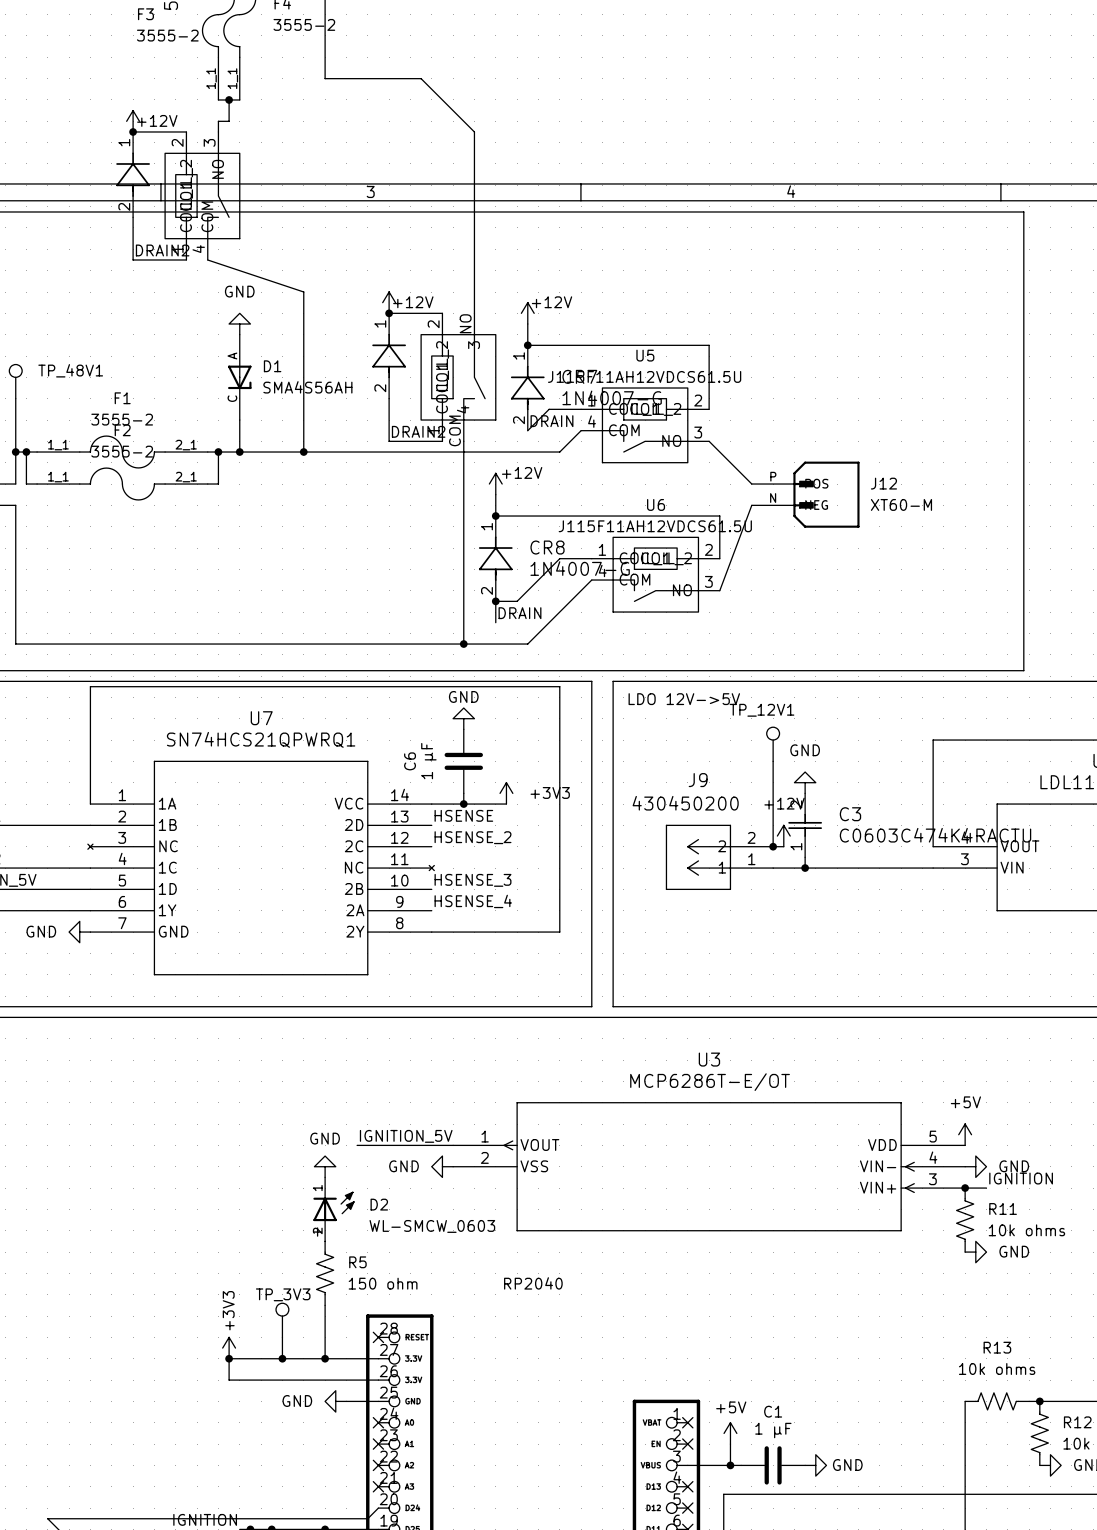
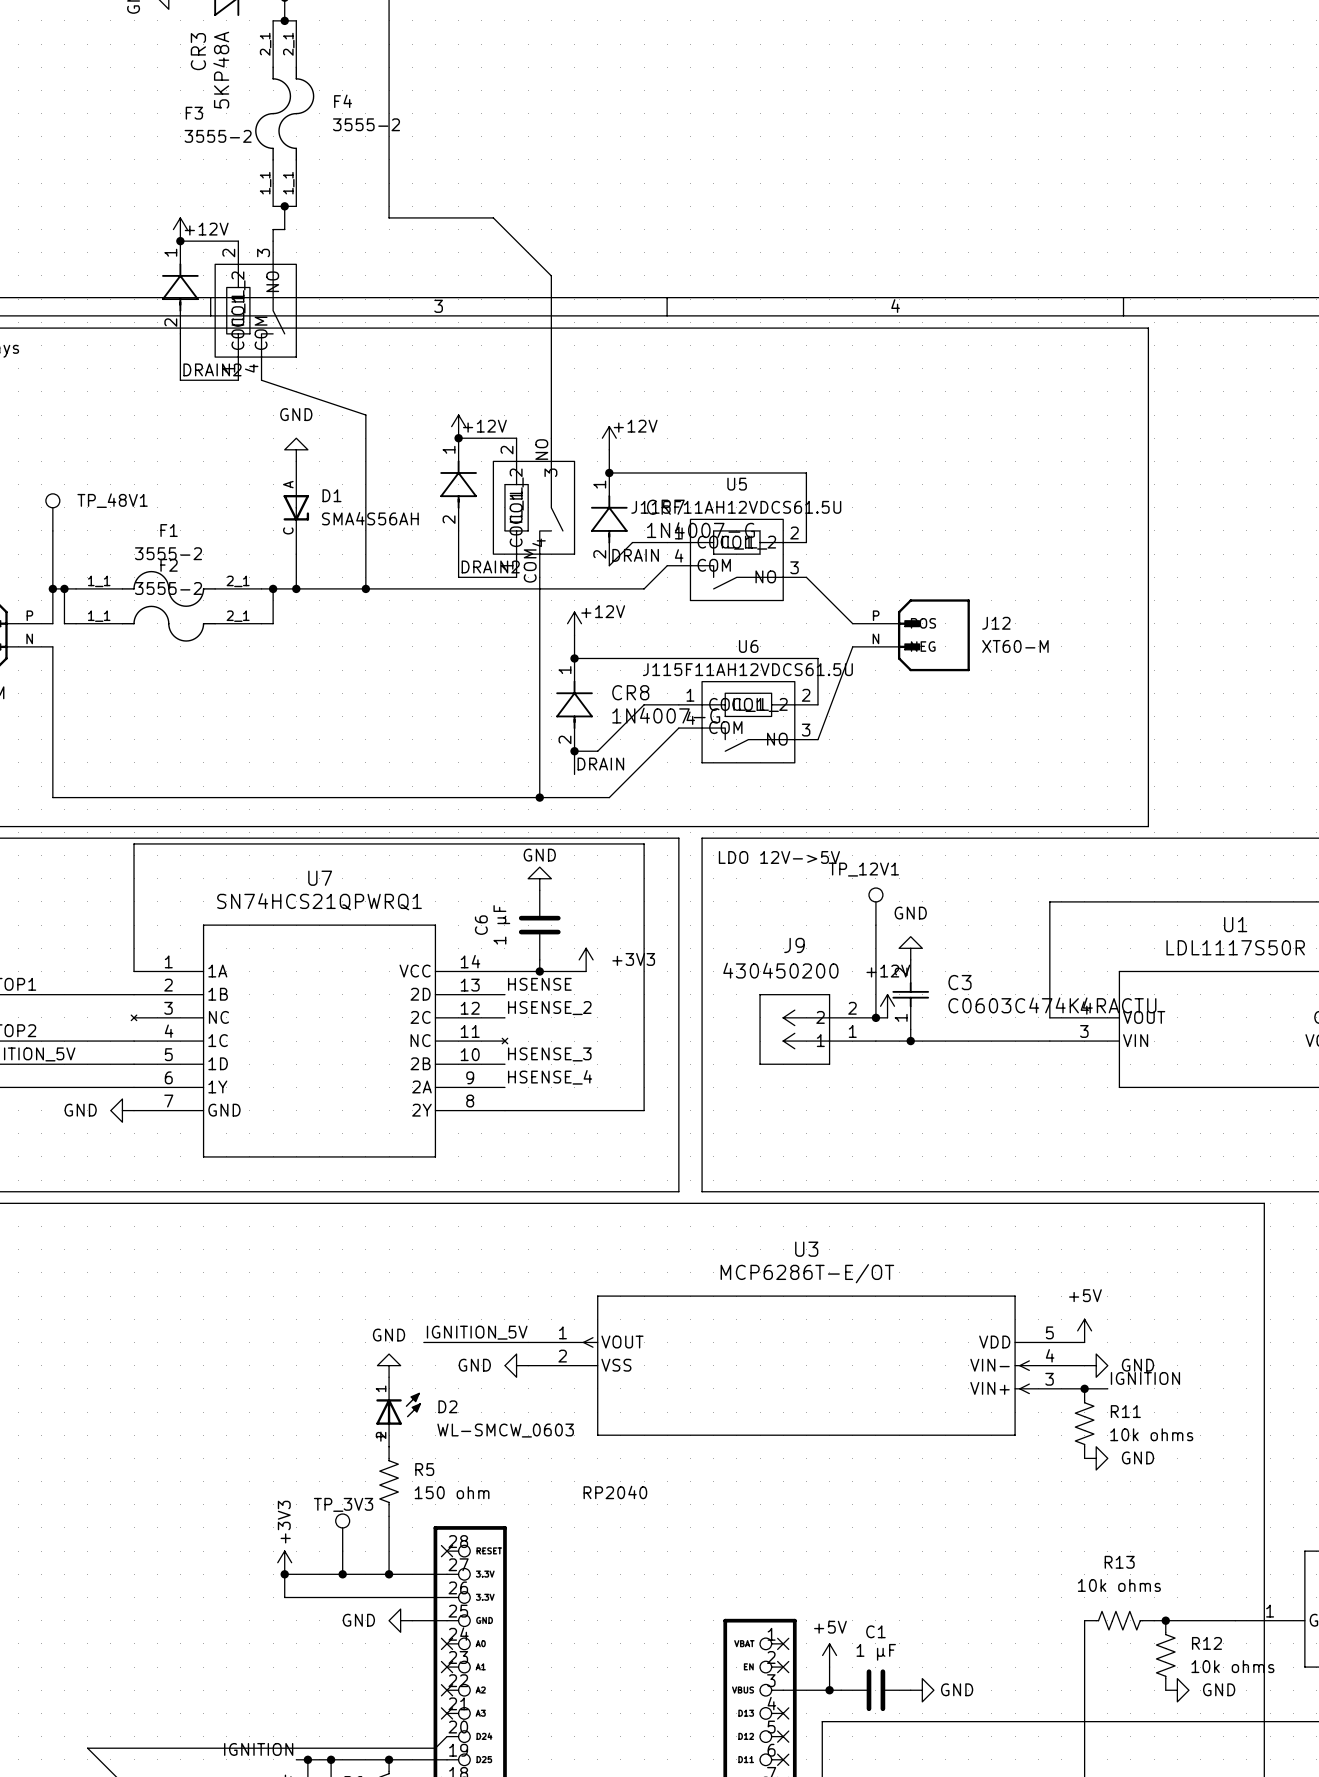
wire: (325, 78) (421, 78) (474, 131) (474, 163) -> (389, 183) (389, 217) (493, 217) (551, 275)

